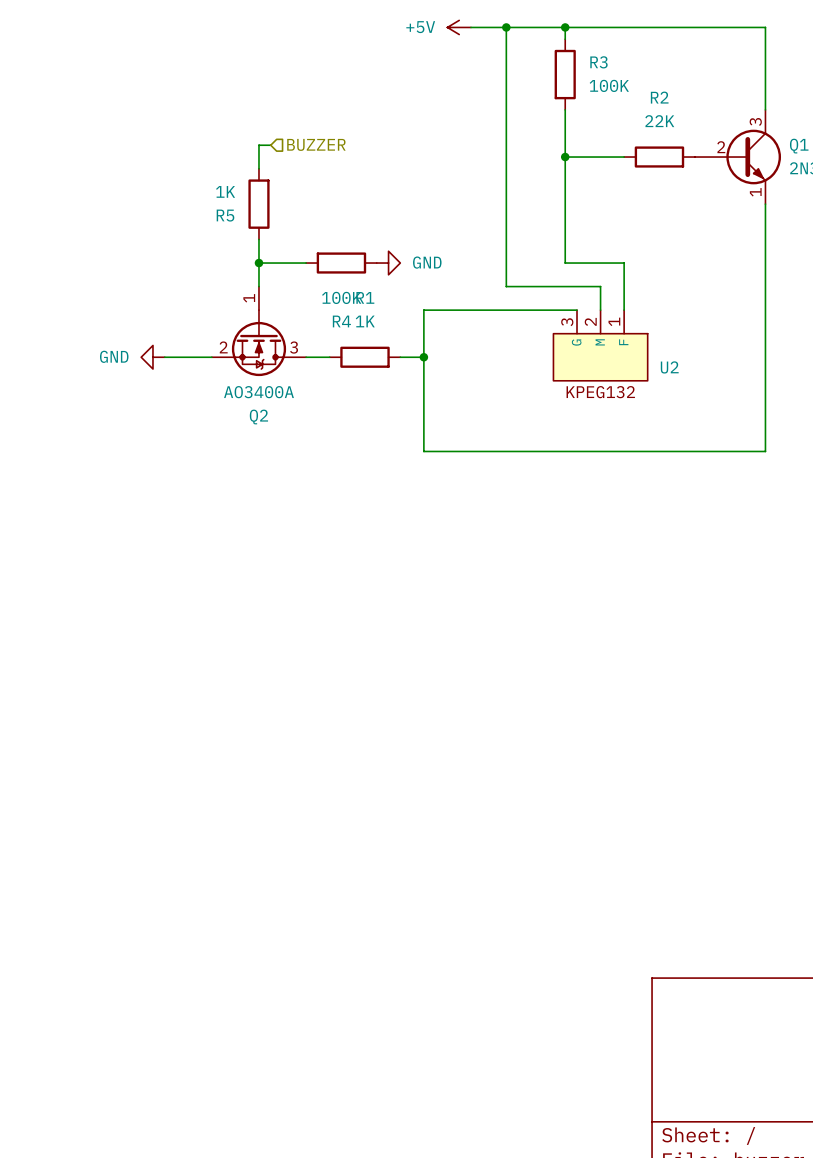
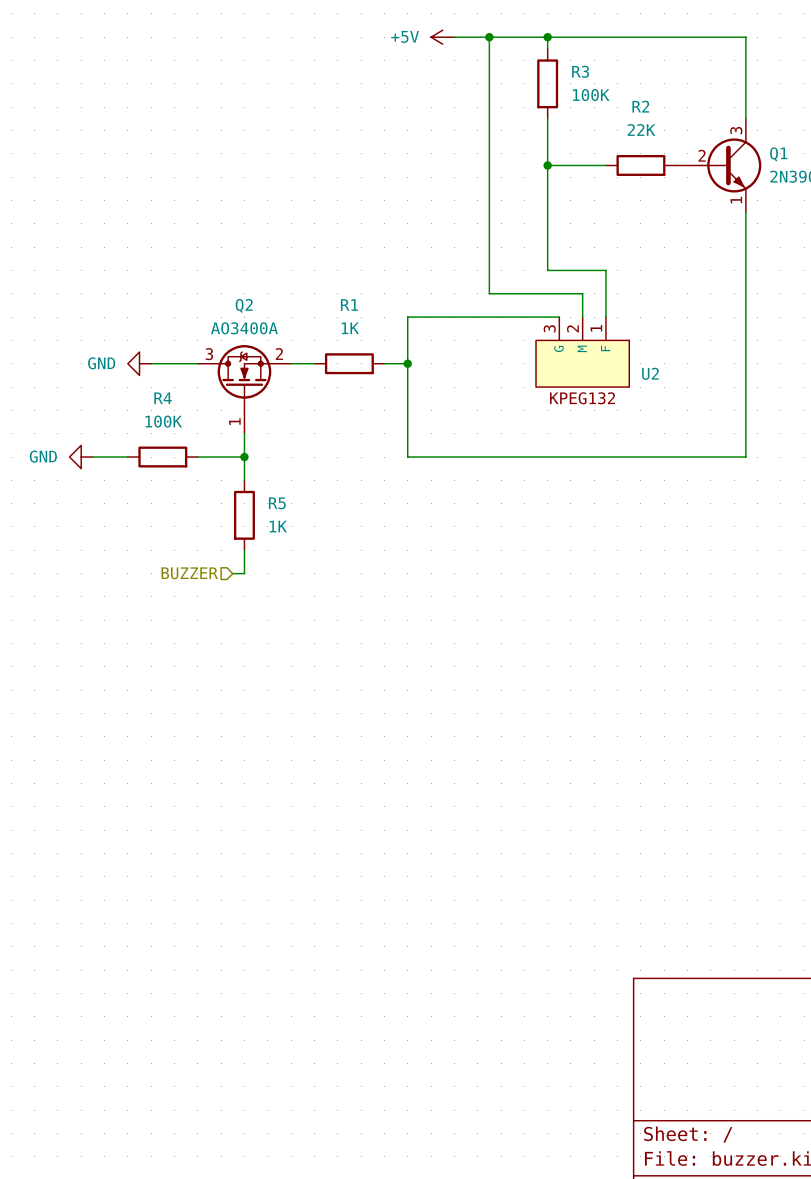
hierarchical label: BUZZER (316, 144) -> none
wire: (270, 145) (258, 145) (258, 168) -> none
R5 value position: 1K (225, 191) -> 1K (278, 526)
R5 position: (258, 204) -> (244, 515)
R5 name position: R5 (225, 215) -> R5 (277, 503)
wire: (258, 239) (258, 286) -> (244, 433) (244, 480)
wire: (258, 263) (306, 263) -> (197, 457) (244, 457)
junction: (258, 263) -> none
R4 position: (341, 263) -> (162, 457)
power symbol: GND (388, 263) -> none
R4 value position: 100K (341, 297) -> 100K (163, 421)
R4 name position: R4 (341, 321) -> R4 (163, 398)
Q2 rotation: 0° (258, 343) -> 180° (244, 377)
power symbol: none -> GND (81, 457)
wire: none -> (92, 457) (127, 457)
junction: none -> (244, 457)
wire: none -> (244, 550) (244, 573) (232, 573)
hierarchical label: none -> BUZZER (189, 573)

